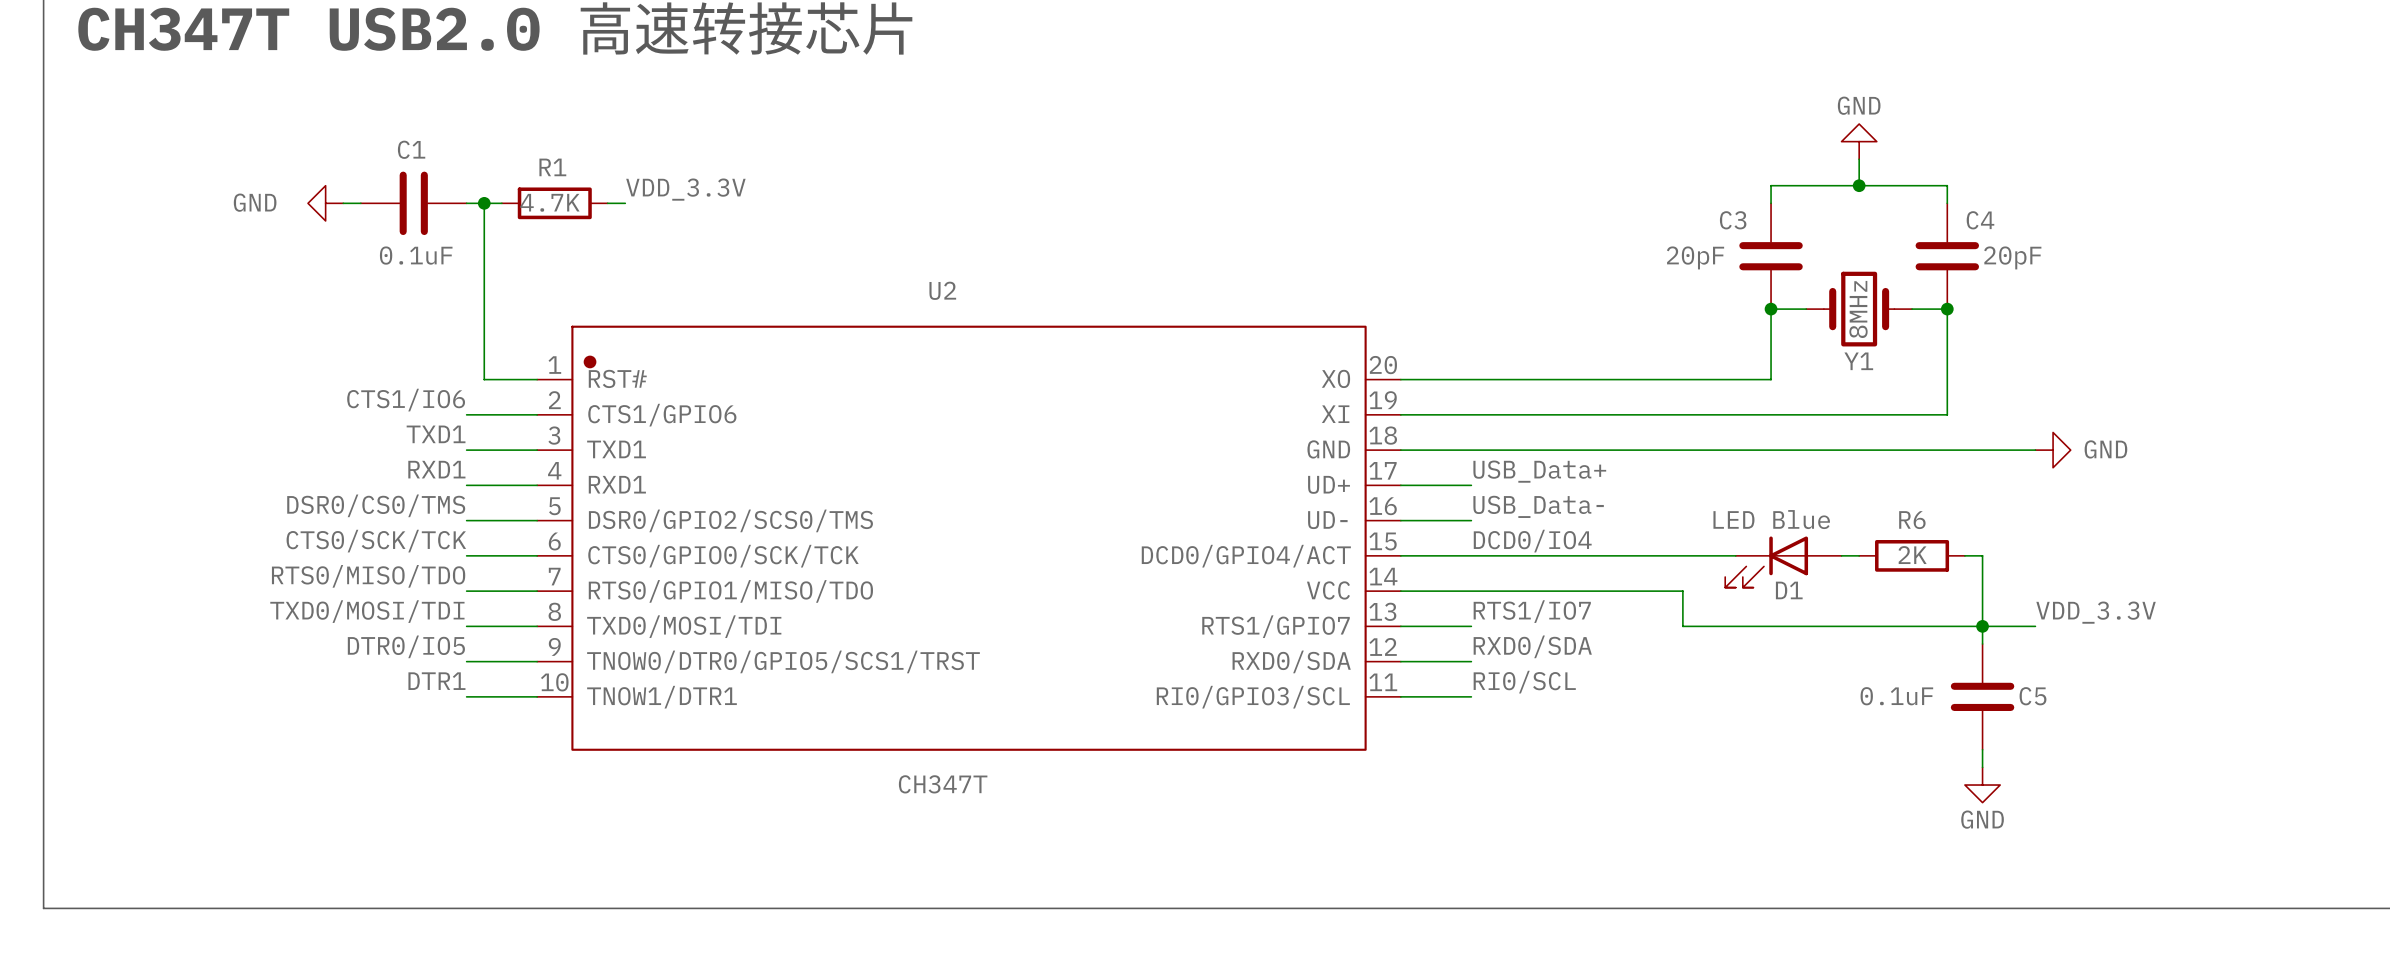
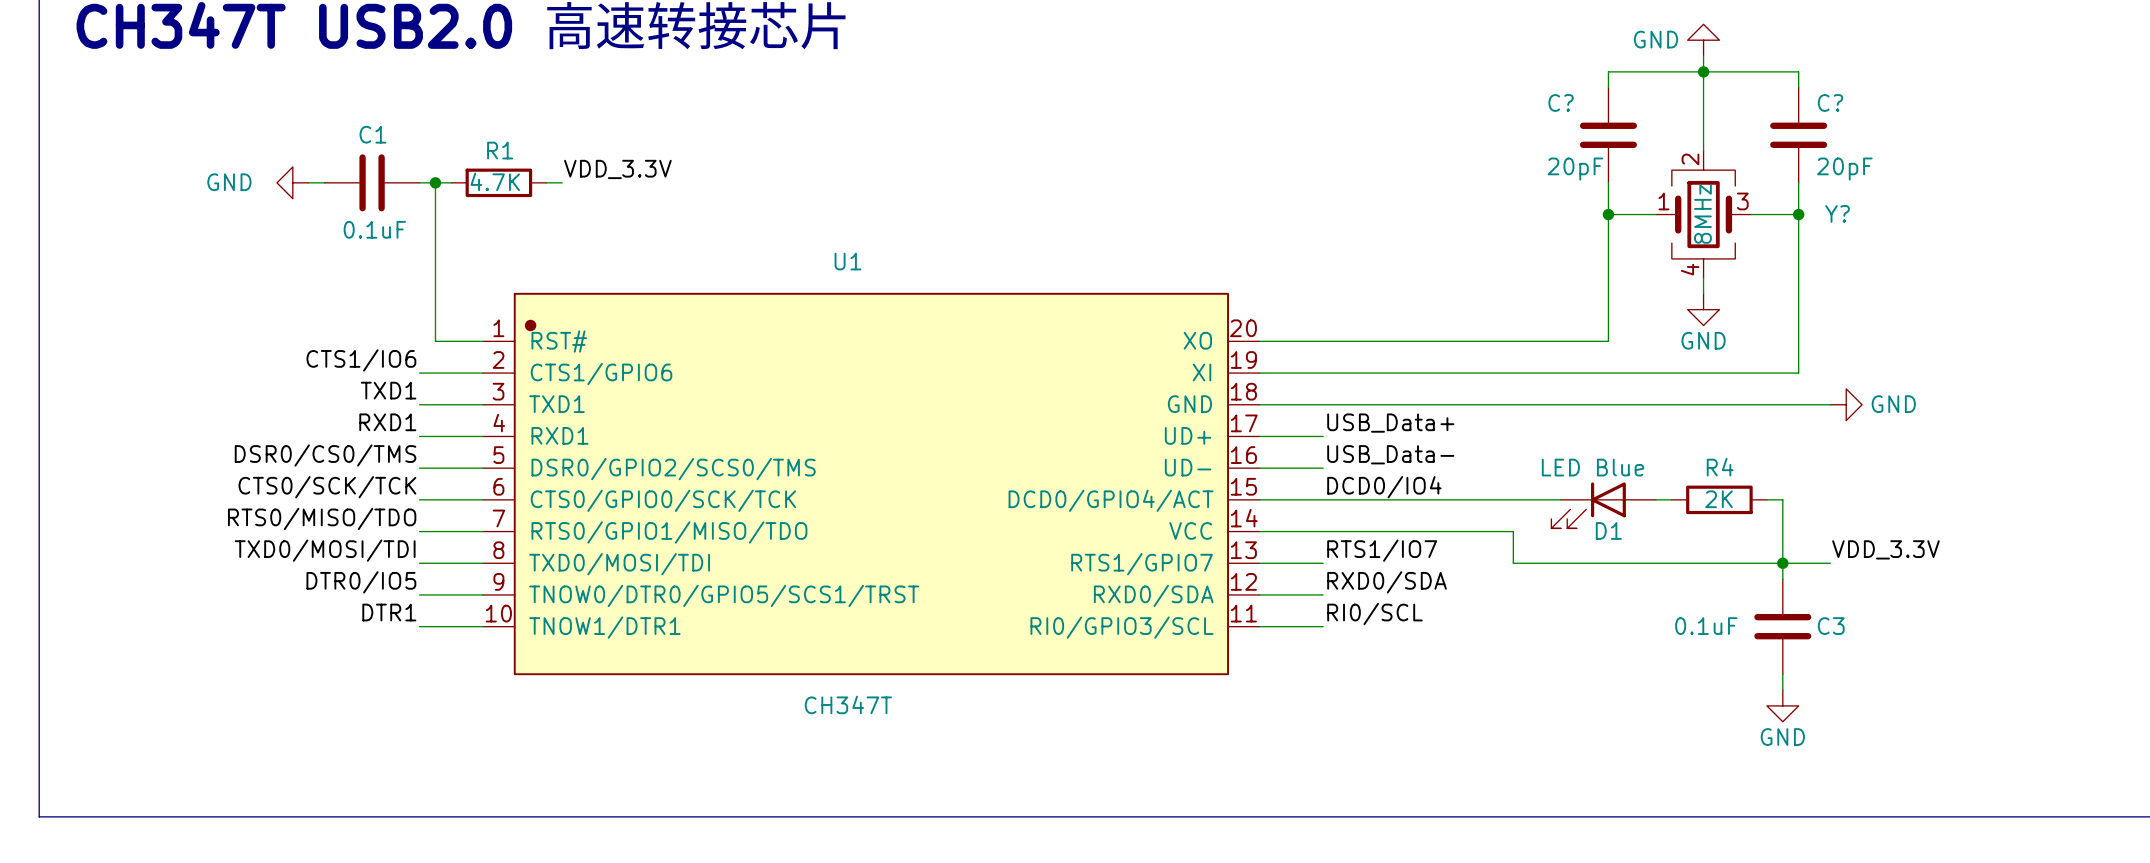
power symbol: none -> GND (1703, 40)
wire: none -> (1703, 56) (1703, 151)
junction: none -> (1703, 71)
wire: none -> (1608, 87) (1608, 71) (1798, 71) (1798, 87)
power symbol: GND (1859, 141) -> none
C?: none -> 20pF (1608, 135)
C?: none -> 20pF (1798, 135)
wire: (1859, 159) (1859, 185) -> none
junction: (1859, 185) -> none
wire: (1771, 203) (1771, 185) (1947, 185) (1947, 203) -> none
wire: none -> (1608, 214) (1656, 214)
junction: none -> (1608, 214)
Y?: none -> 8MHz (1703, 214)
wire: none -> (1751, 214) (1798, 214)
junction: none -> (1798, 214)
C3: 20pF (1771, 256) -> none
C4: 20pF (1947, 256) -> none
U2 name: U2 (942, 290) -> U1 (847, 261)
junction: (1771, 309) -> none
wire: (1806, 309) (1771, 309) (1771, 379) -> (1608, 182) (1608, 341) (1592, 341)
Y1: 8MHz (1859, 309) -> none
wire: none -> (1703, 277) (1703, 293)
wire: (1912, 309) (1947, 309) (1947, 414) -> (1798, 182) (1798, 373) (1751, 373)
junction: (1947, 309) -> none
power symbol: none -> GND (1703, 309)
R6 name: R6 (1912, 520) -> R4 (1720, 467)
C5 name: C5 (2033, 696) -> C3 (1831, 626)

